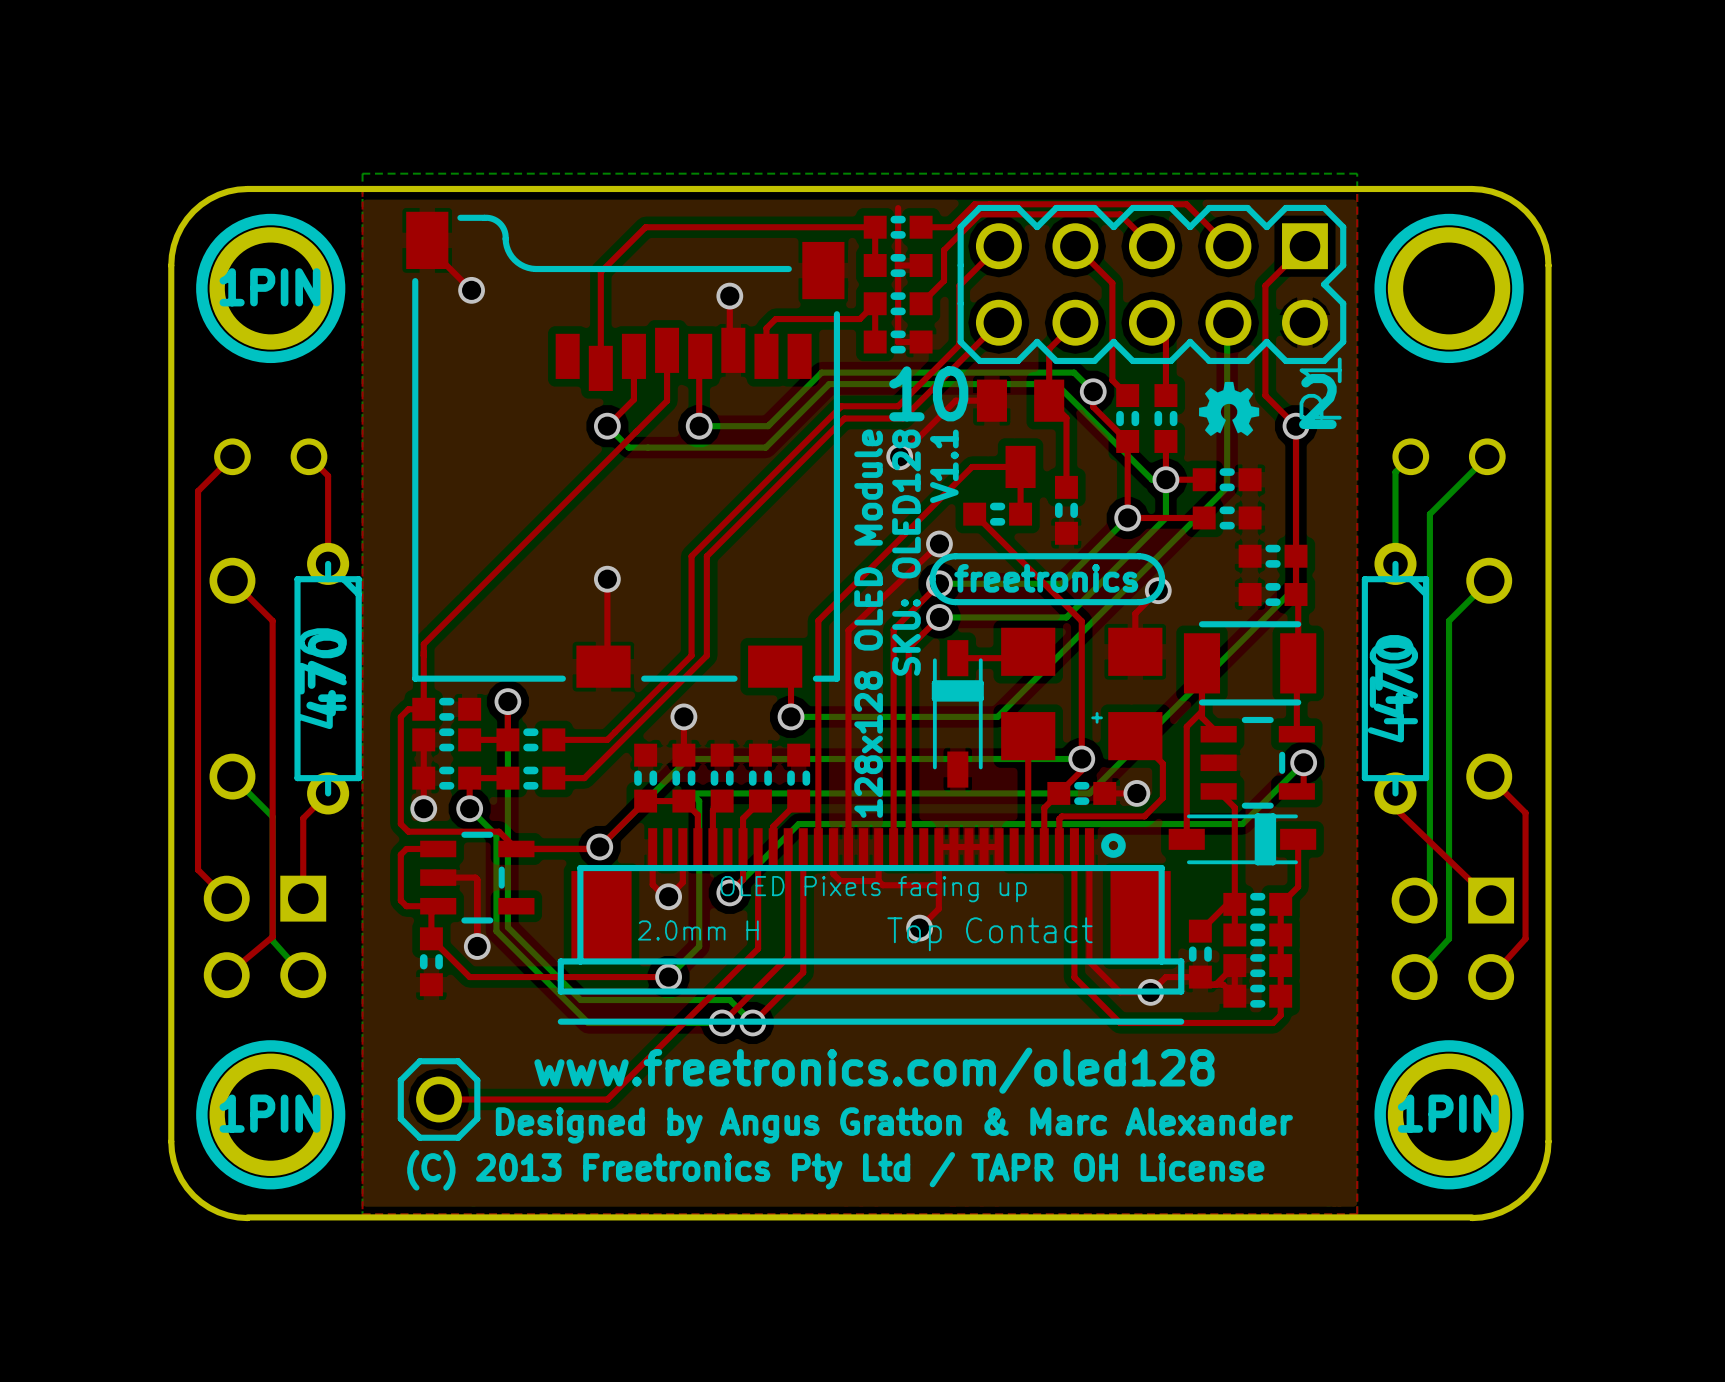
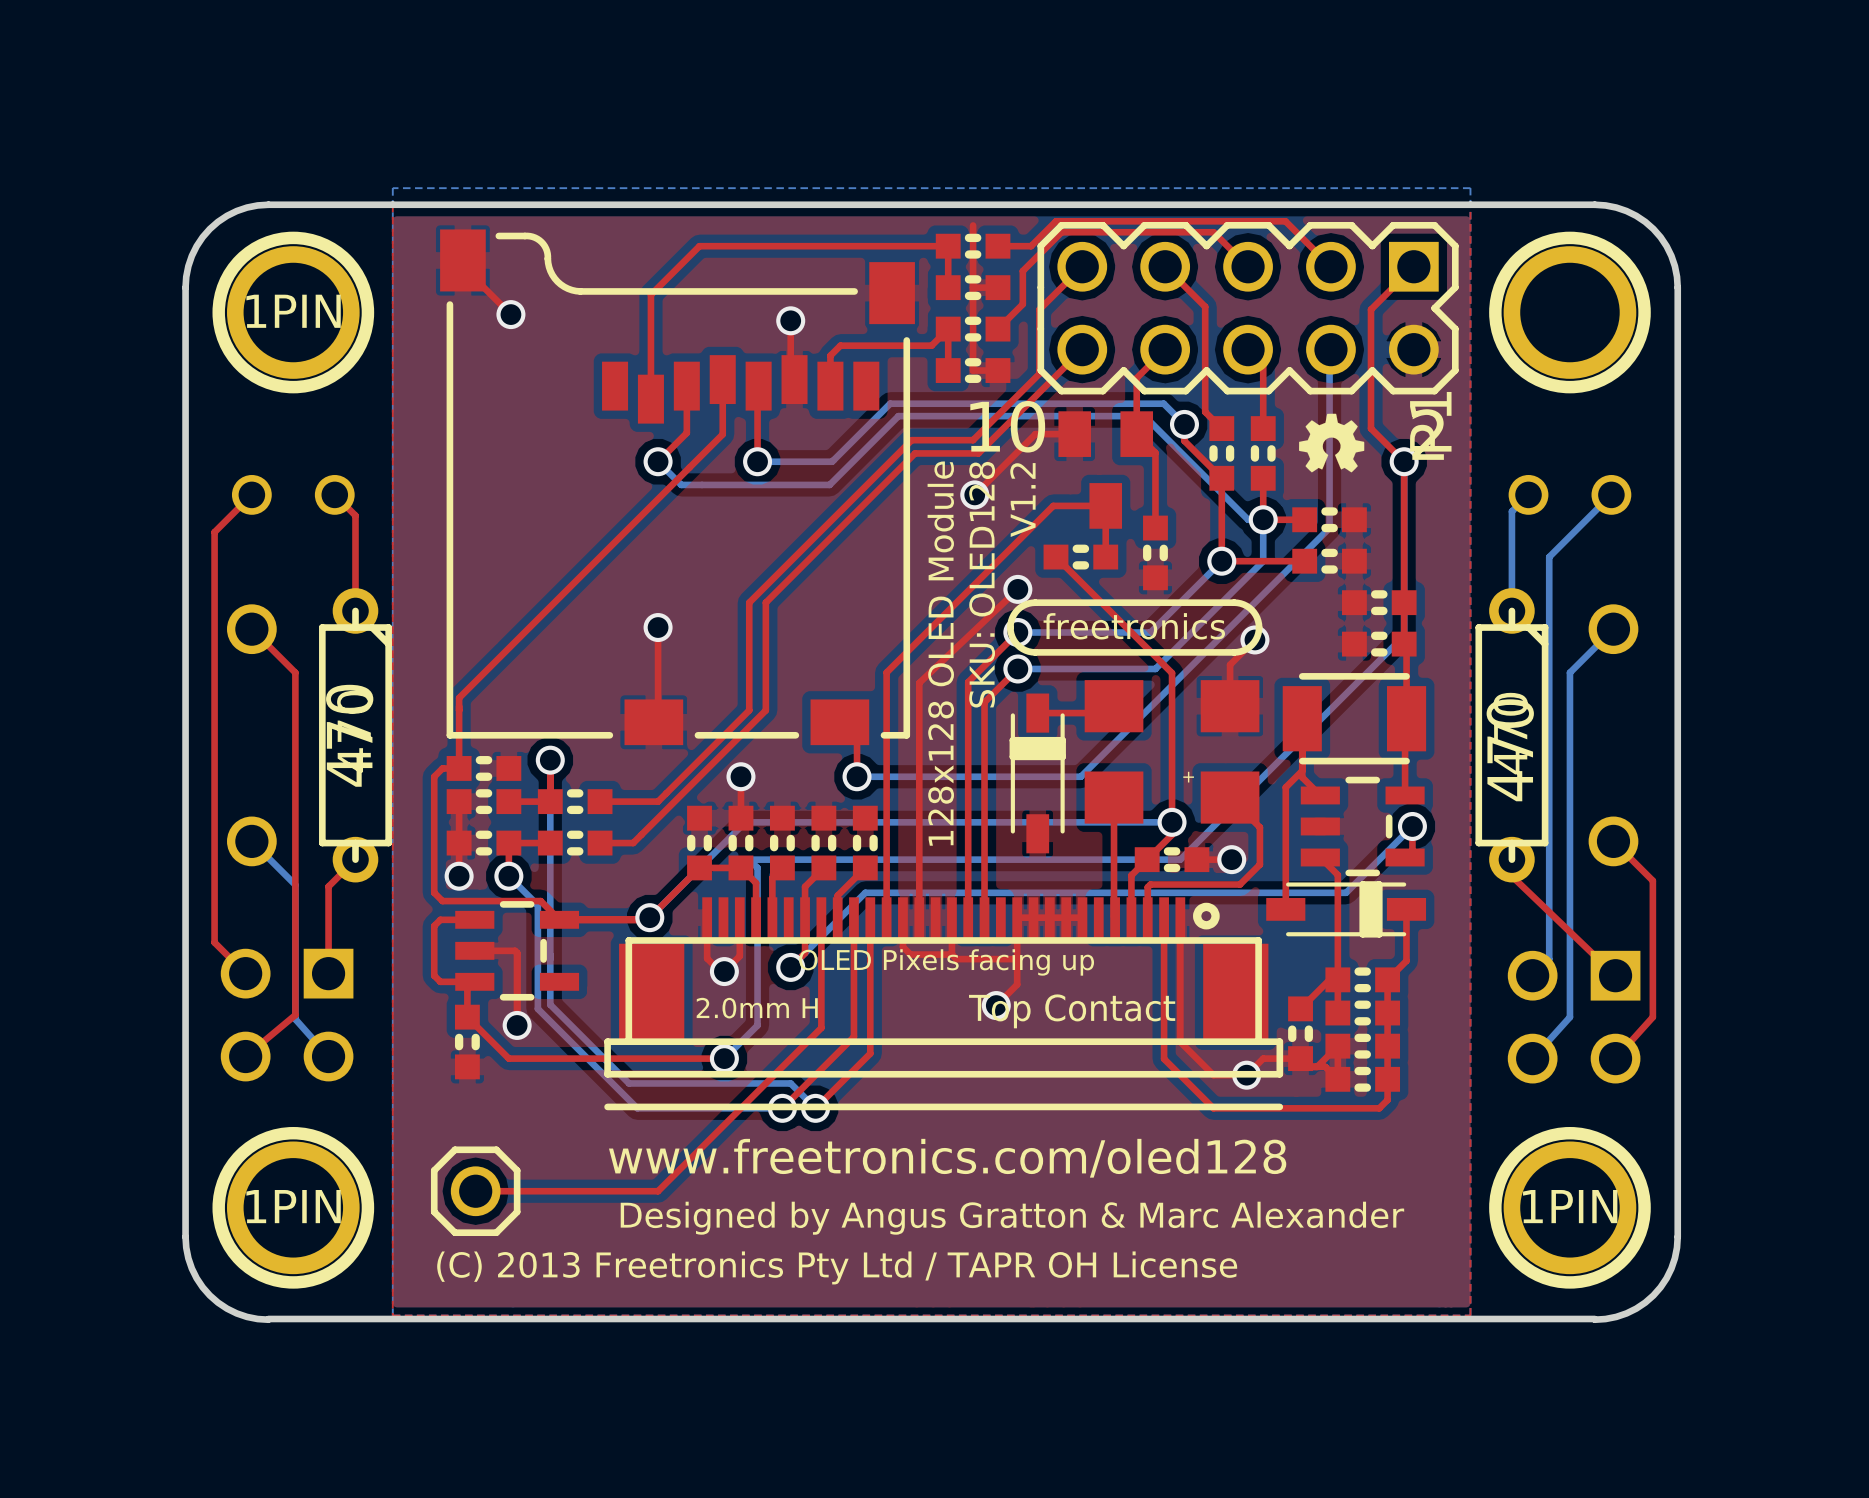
text: V1.1 (944, 466) -> V1.2 (1022, 500)

